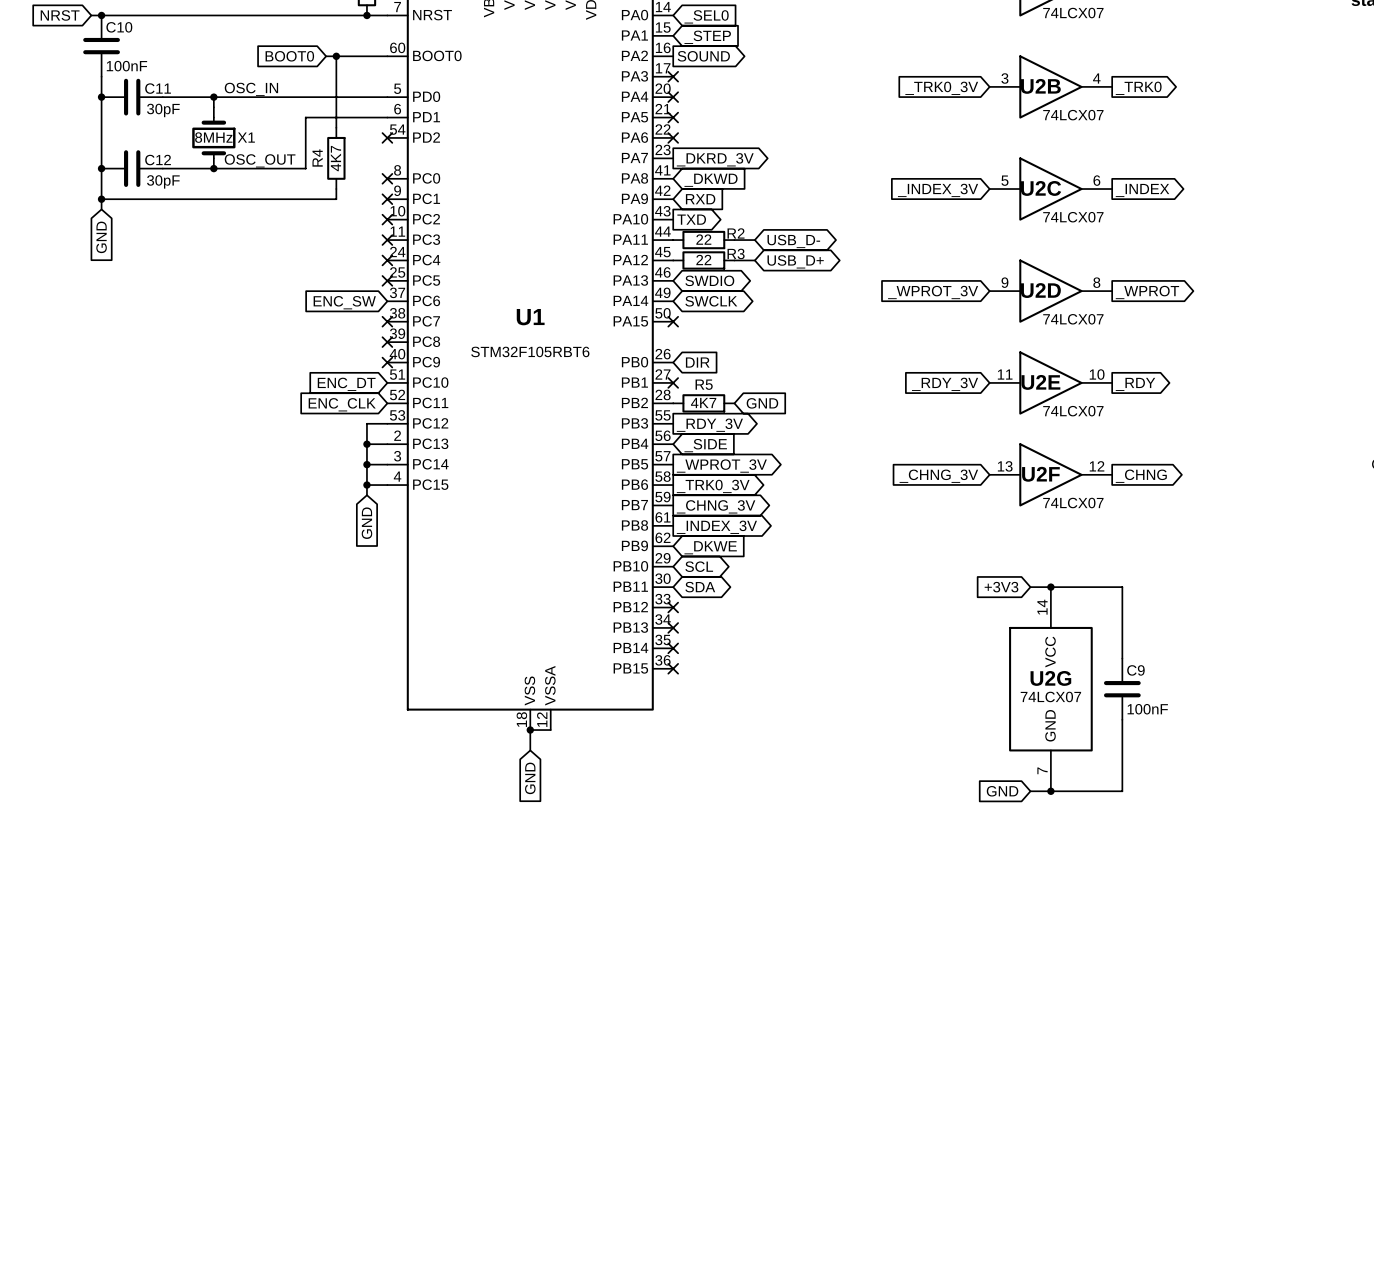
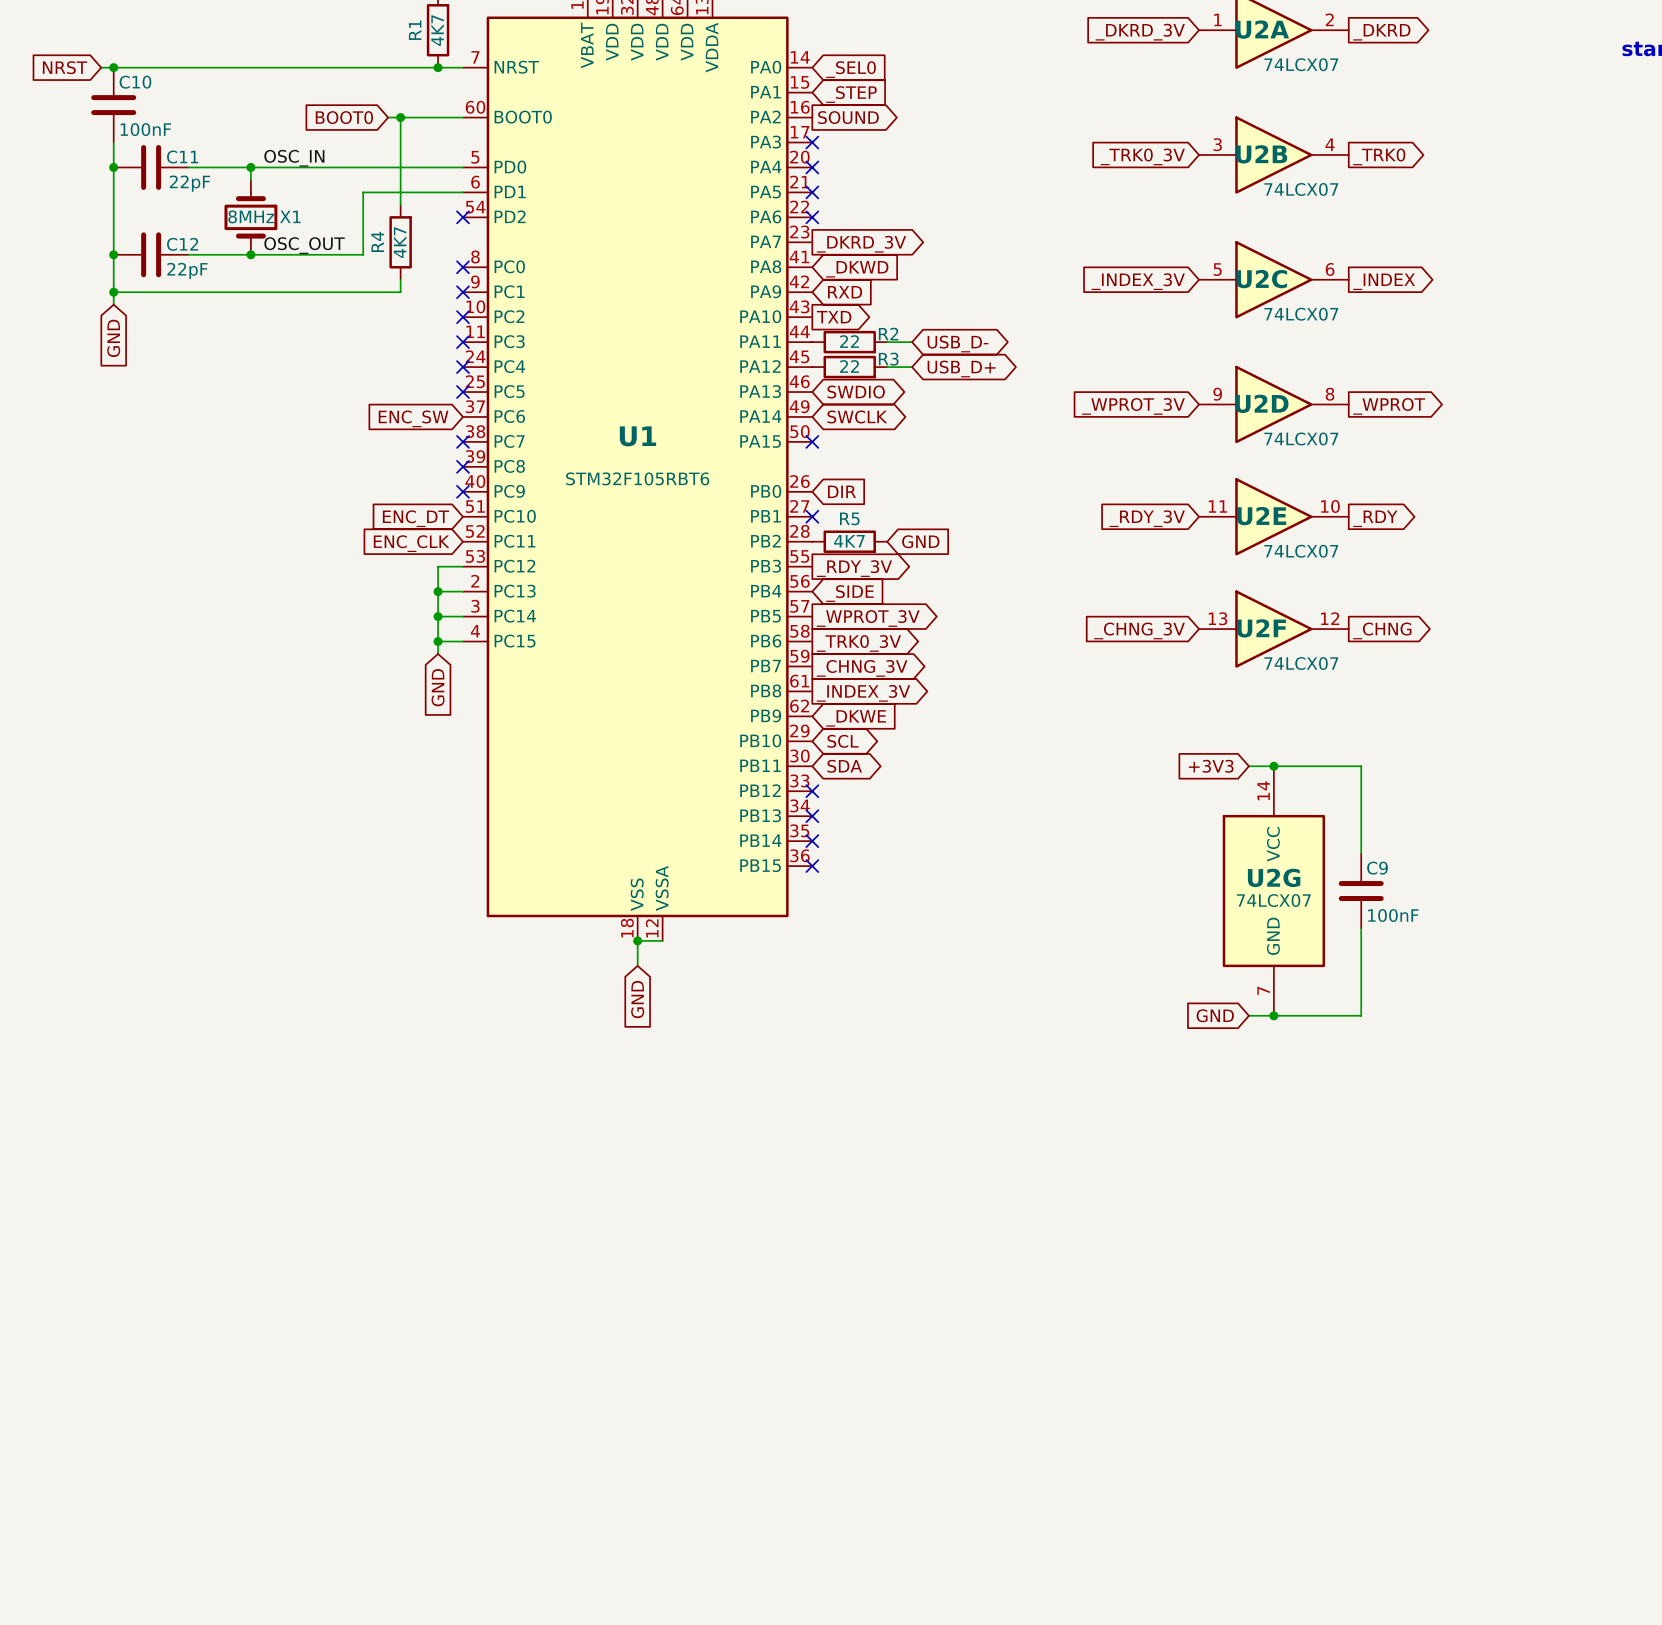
C11 value: 30pF (163, 110) -> 22pF (189, 183)
C12 value: 30pF (163, 181) -> 22pF (187, 270)

